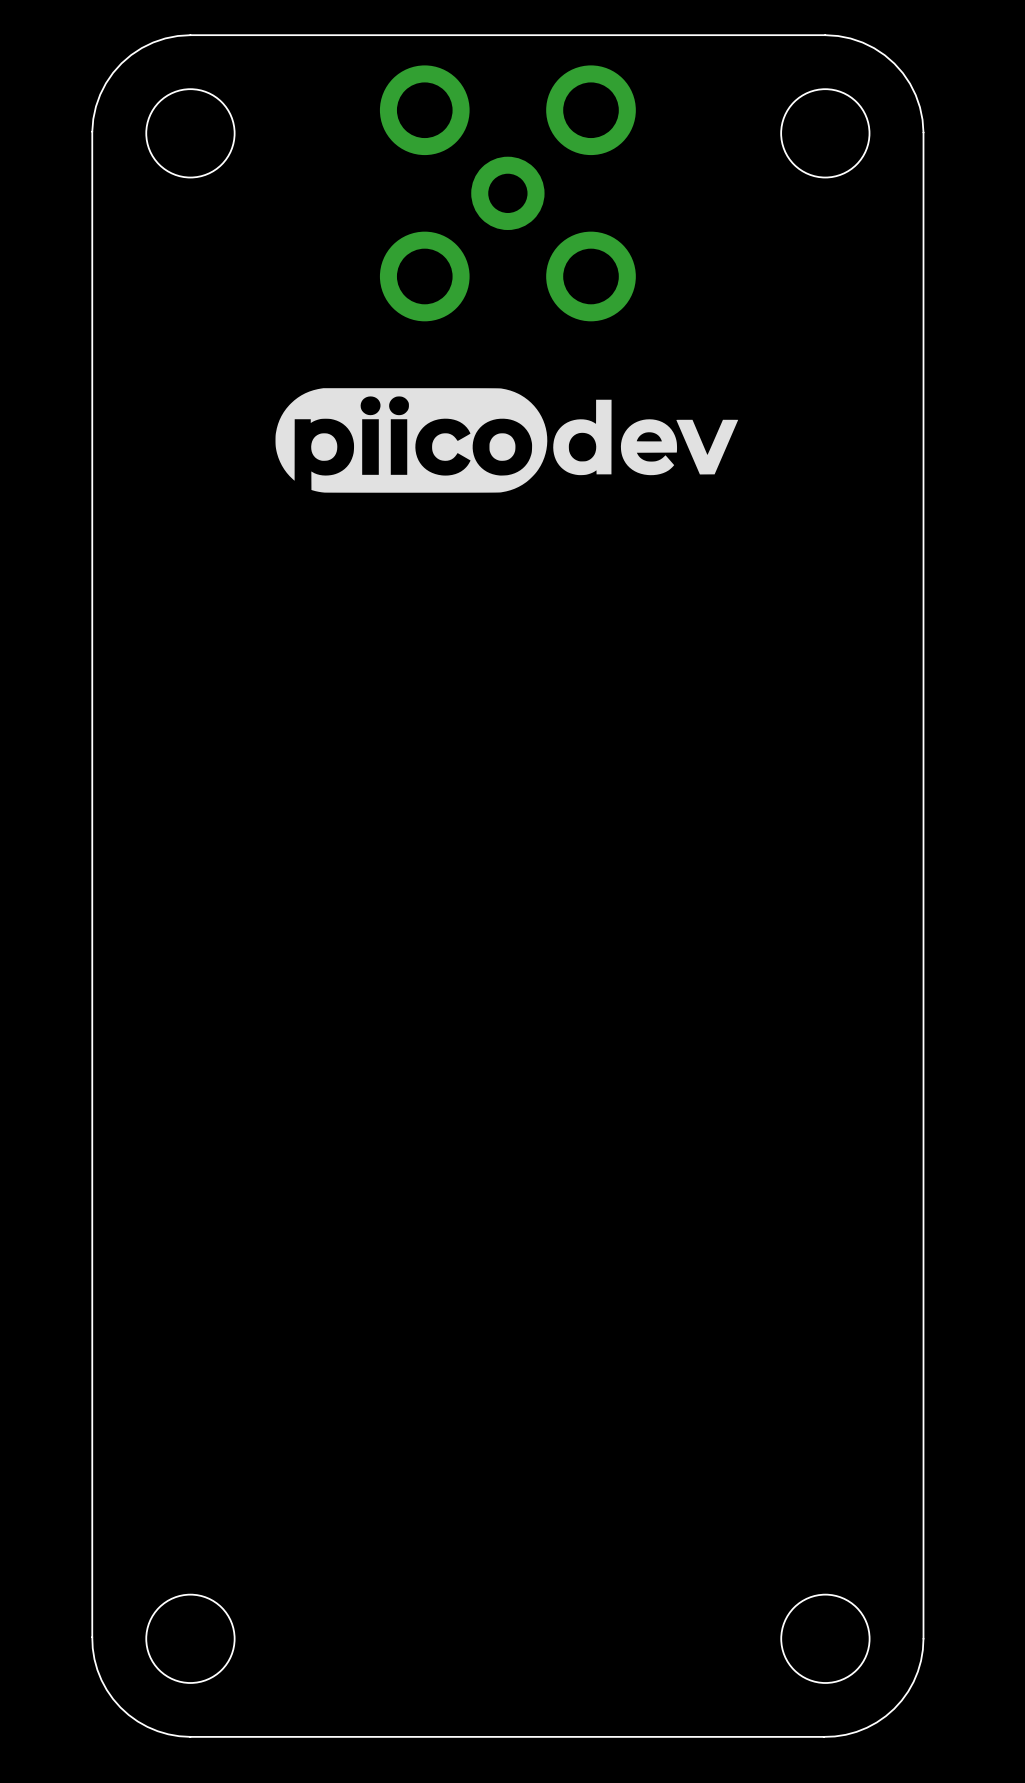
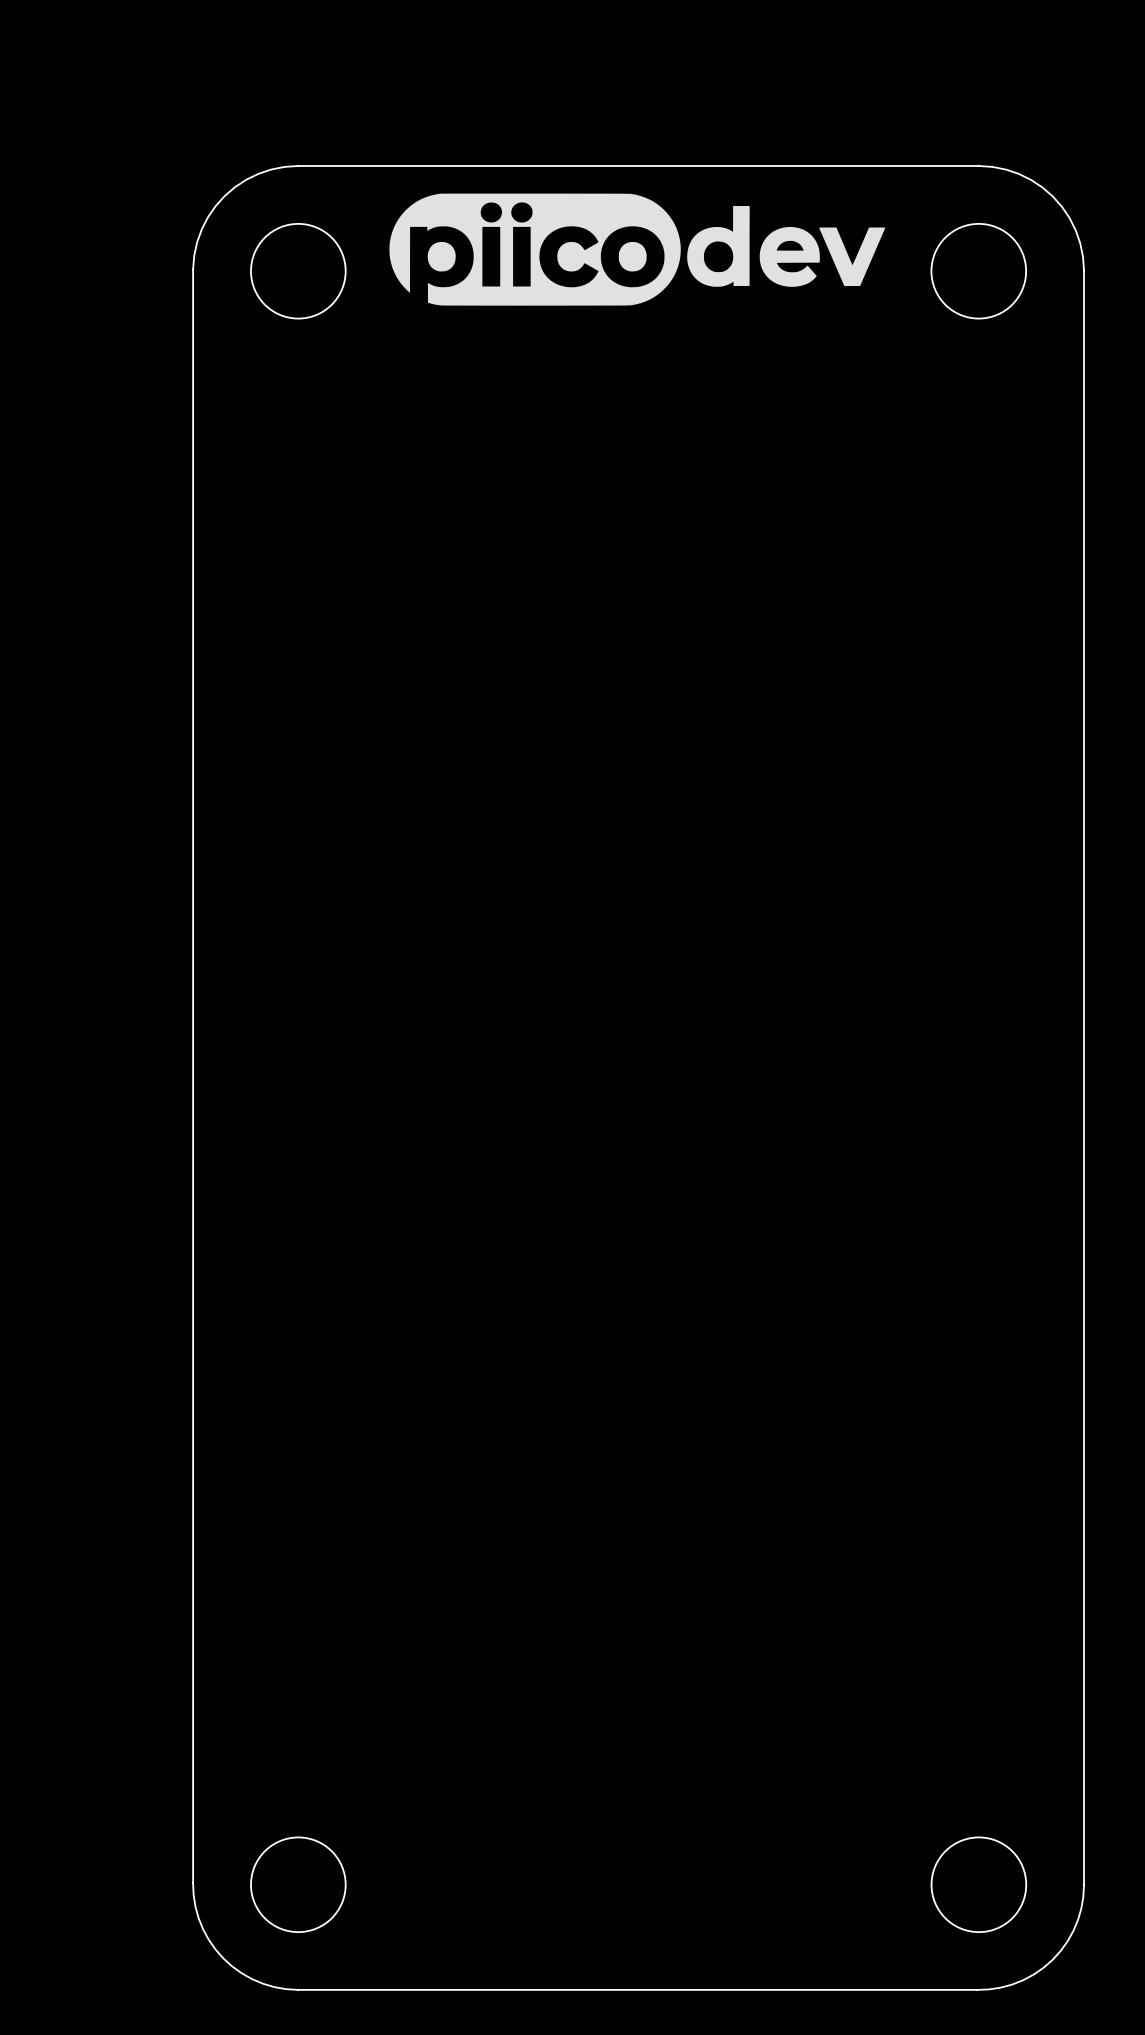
part: (507, 193) -> none
drawing position: (506, 440) -> (637, 249)

